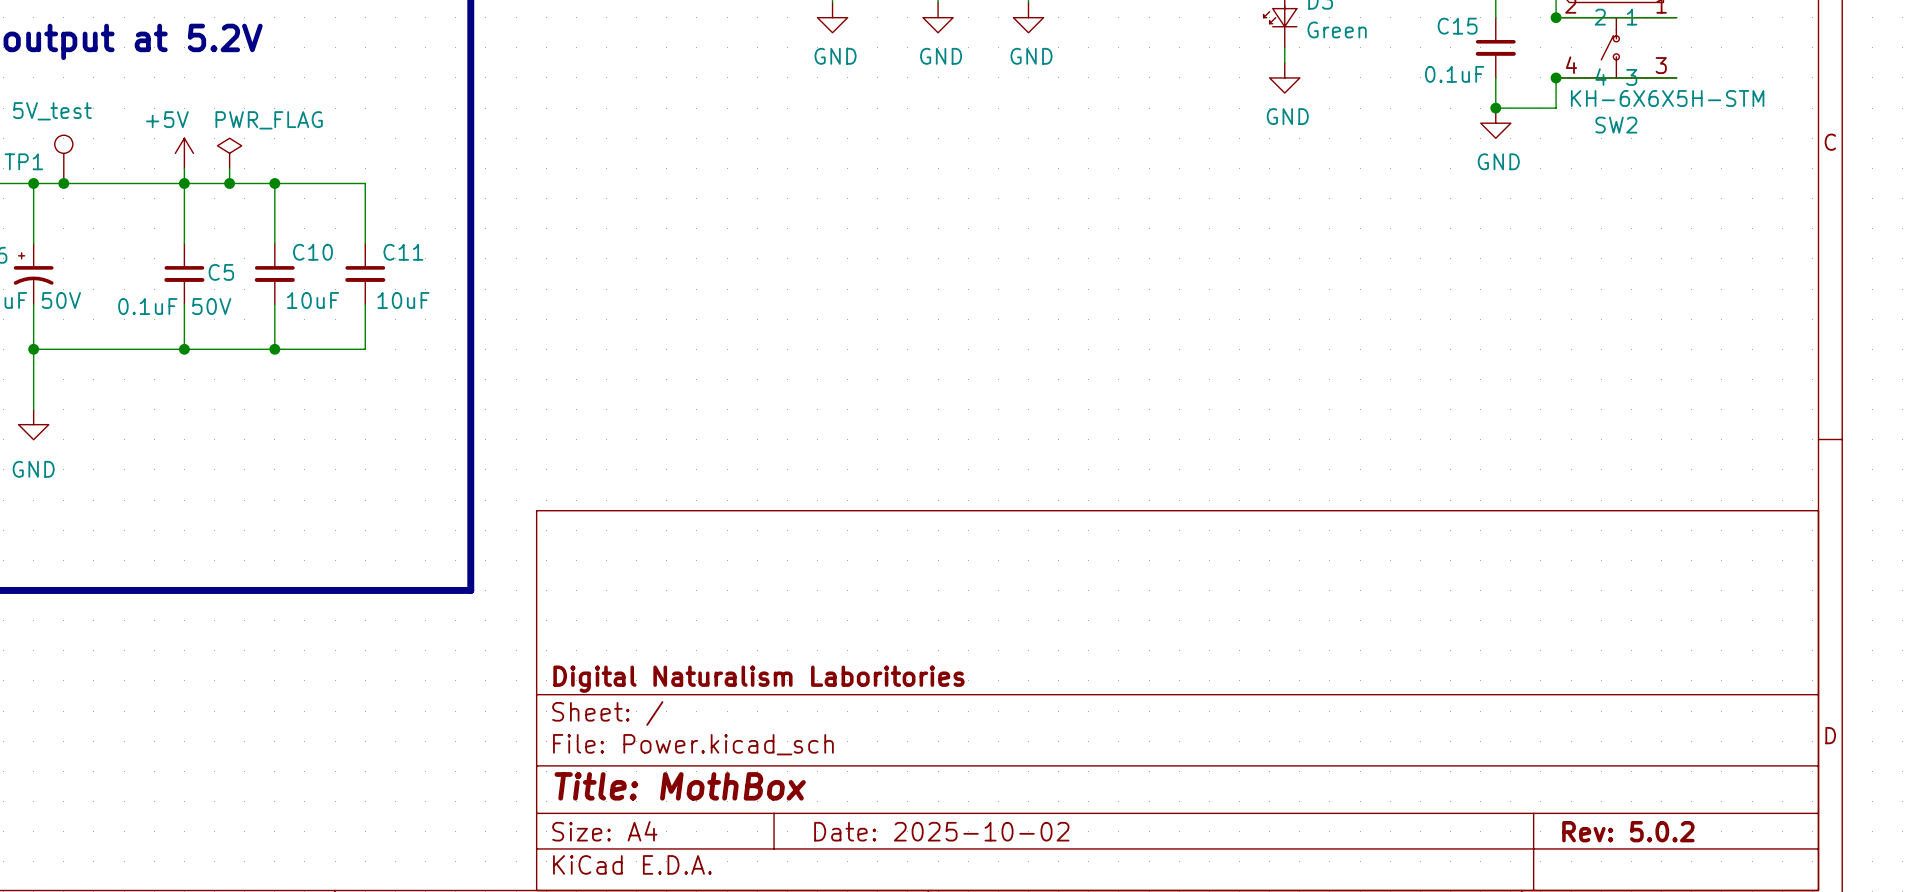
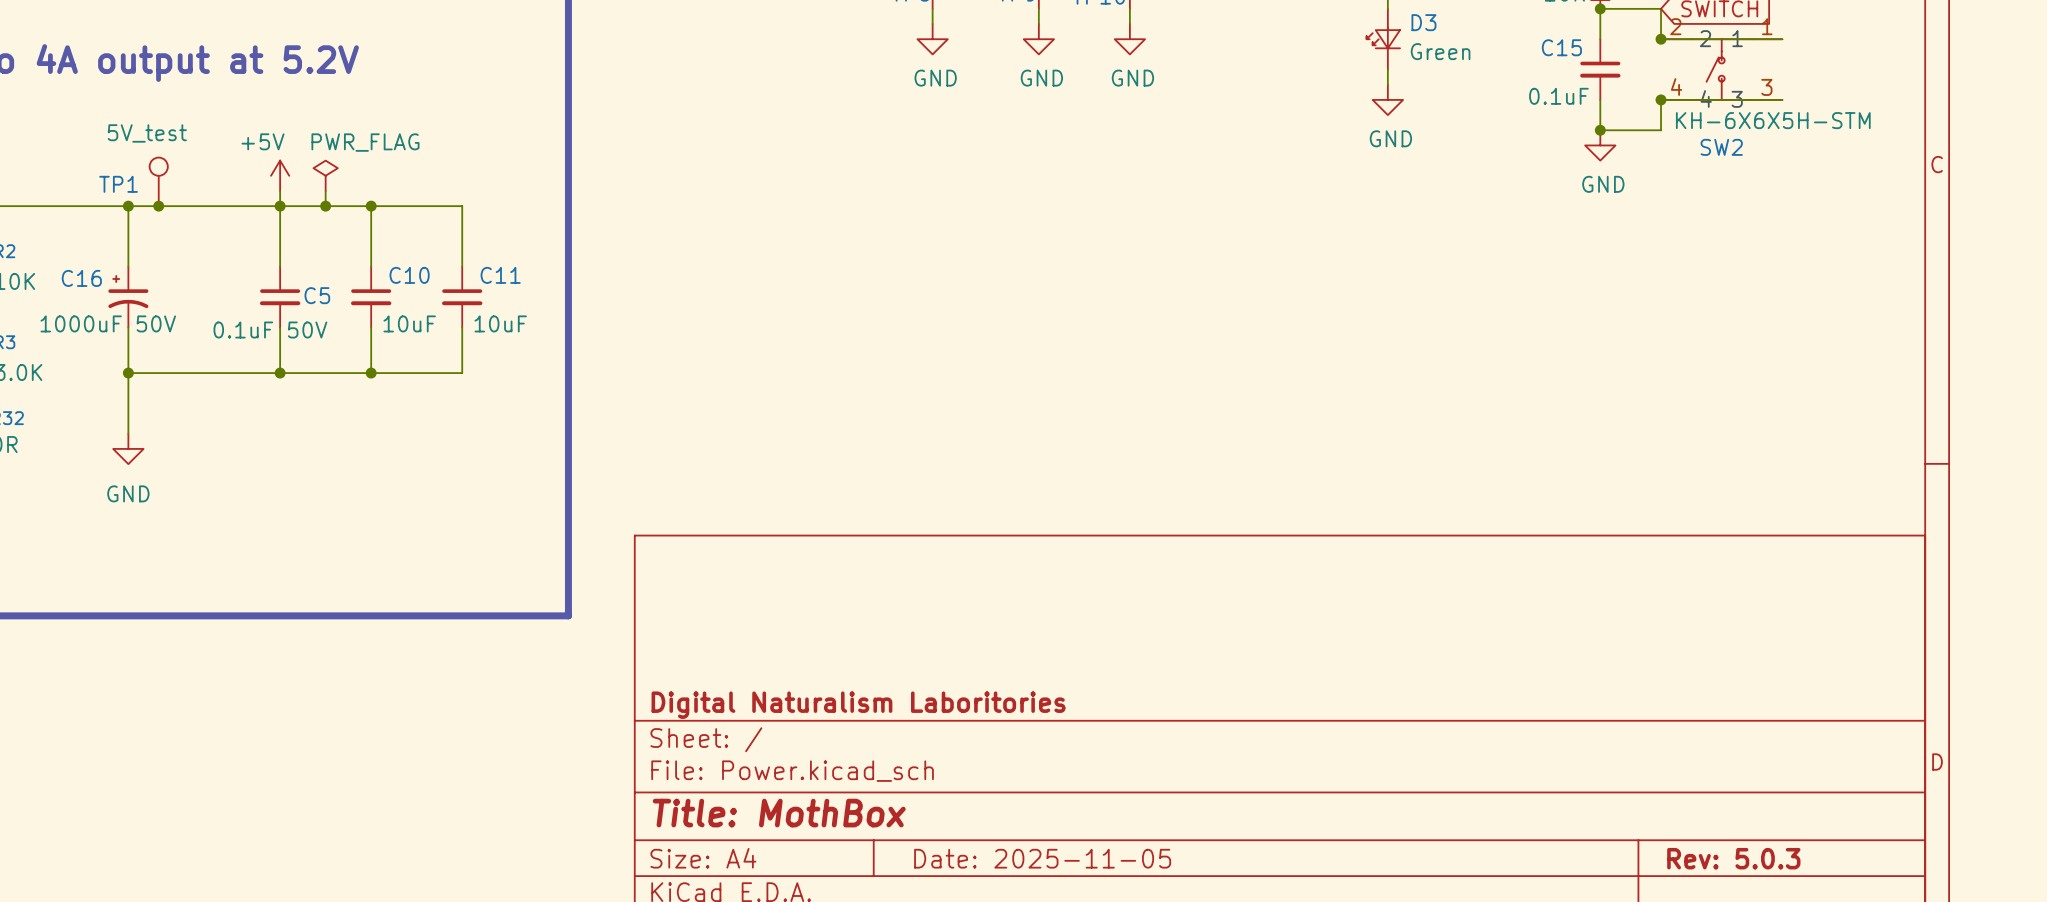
title block: Date: 2025-10-02 (941, 831) -> Date: 2025-11-05 (1042, 858)
title block: Rev: 5.0.2 (1628, 831) -> Rev: 5.0.3 (1733, 858)

